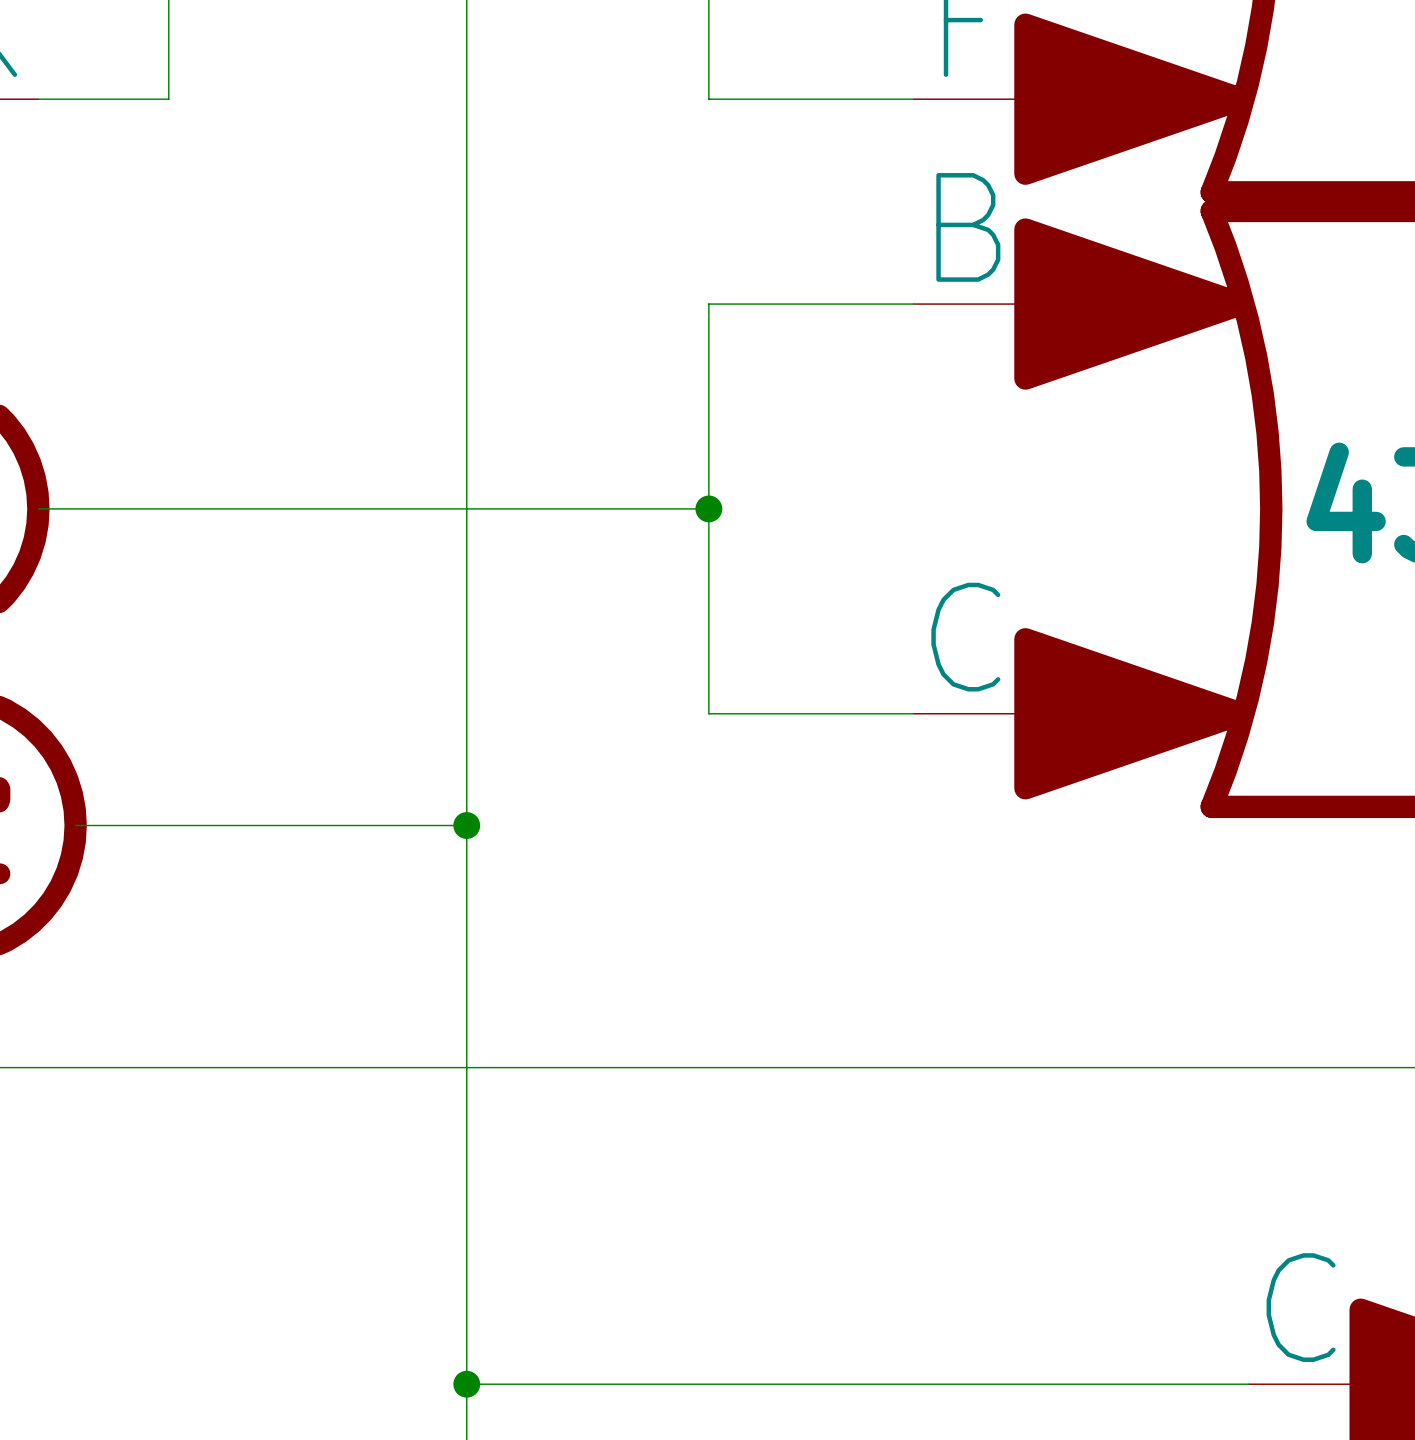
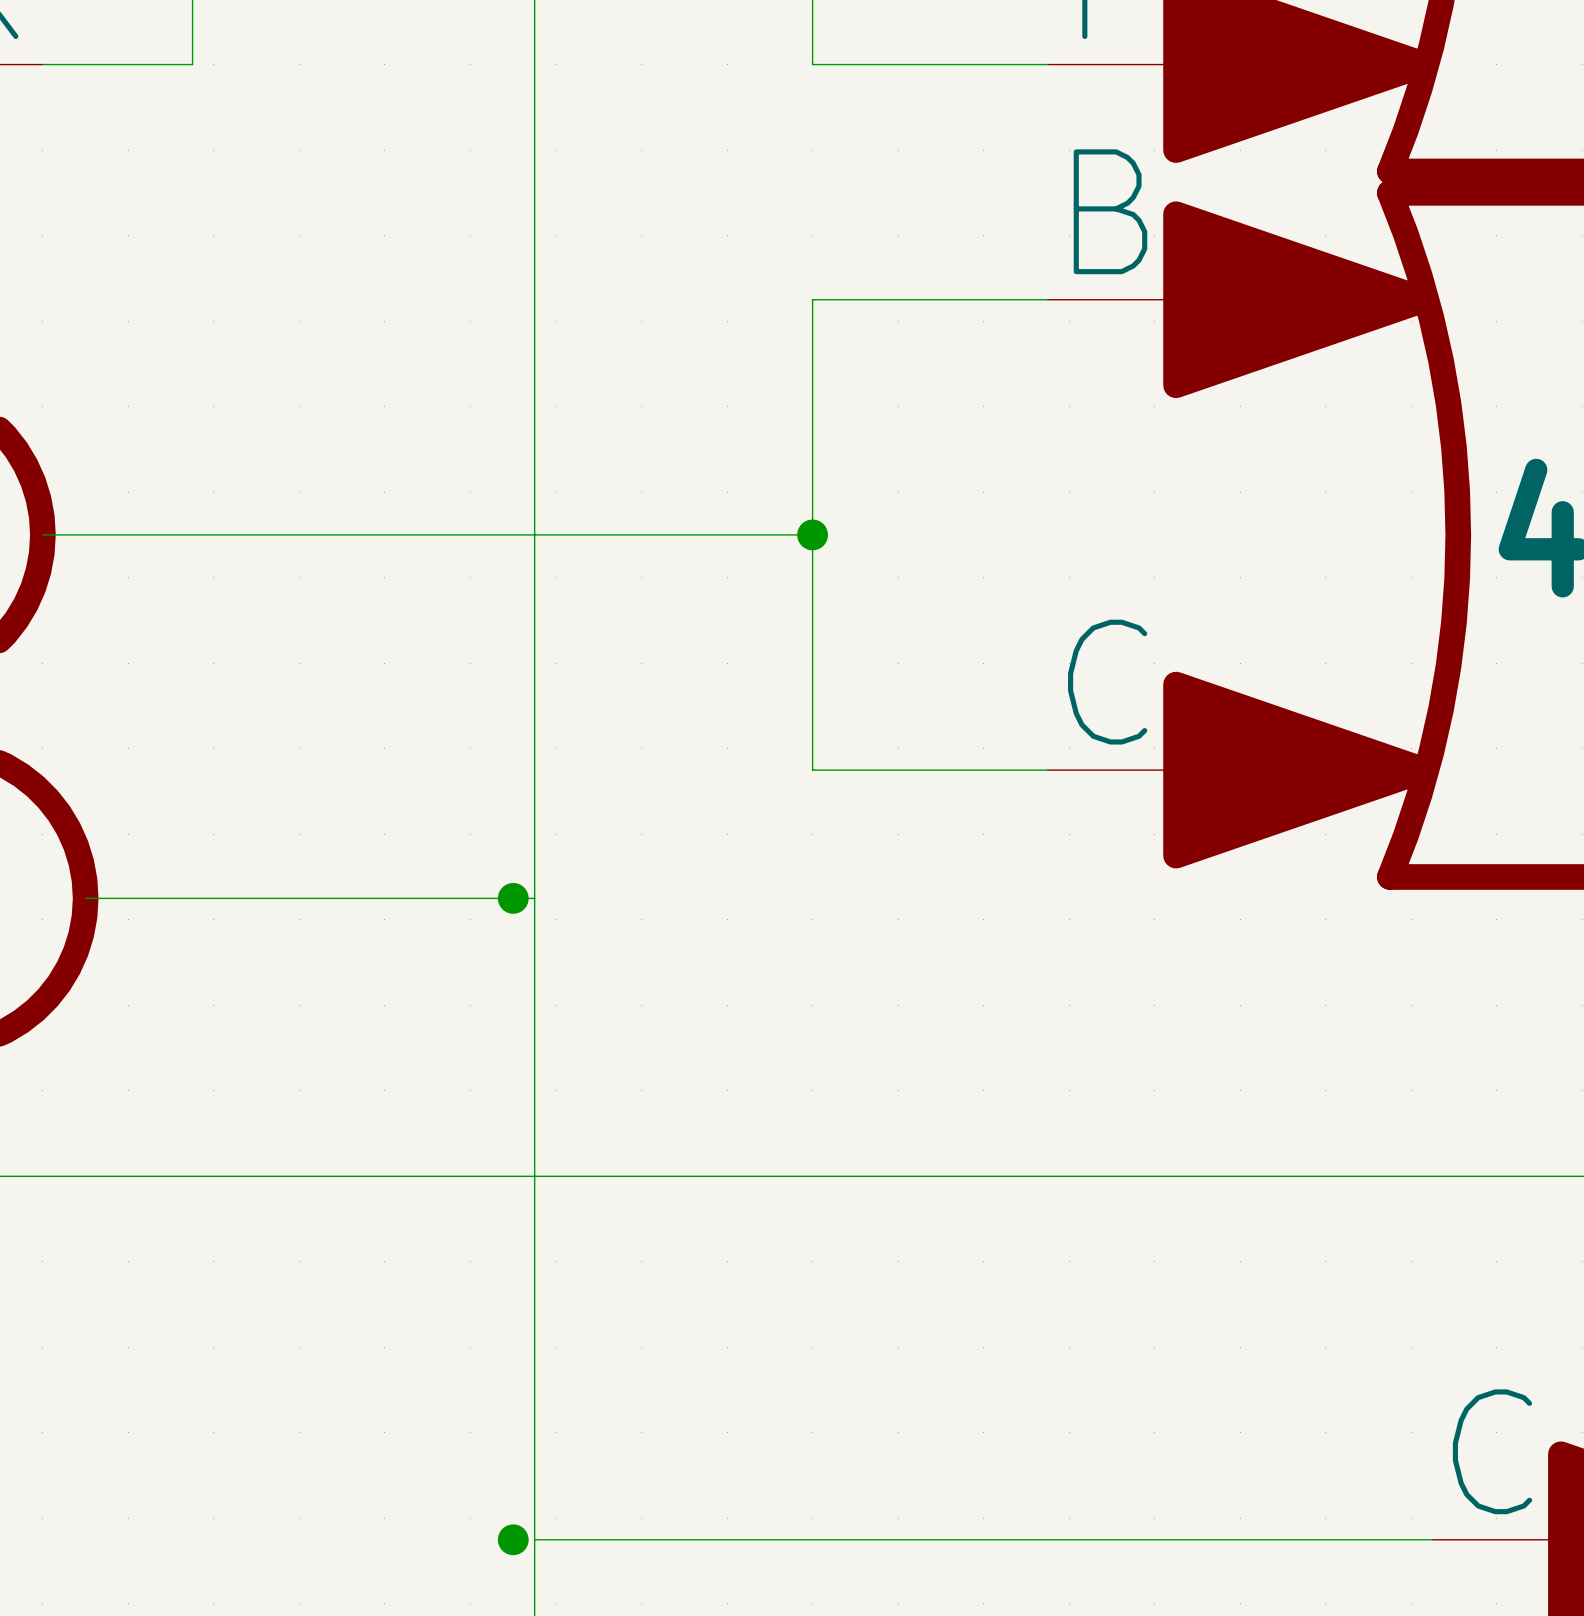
junction position: (466, 825) -> (513, 898)
junction position: (466, 1384) -> (513, 1539)

